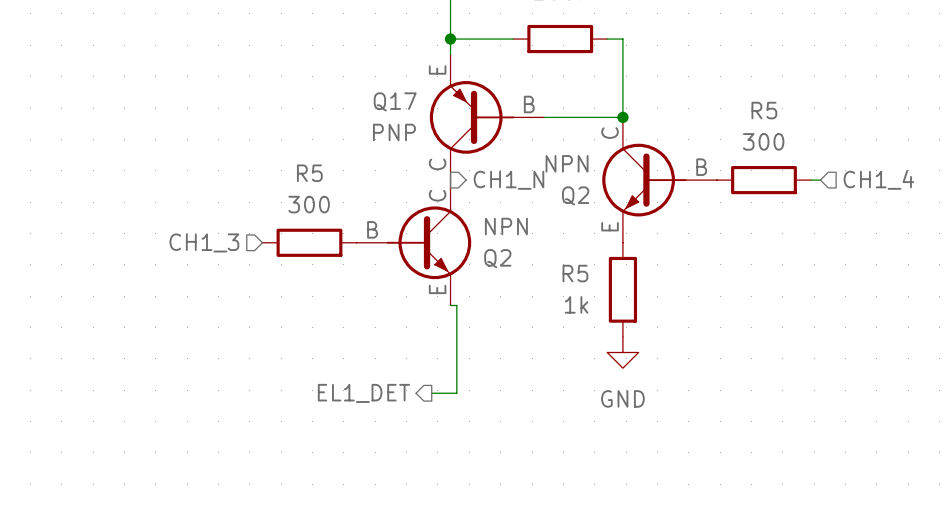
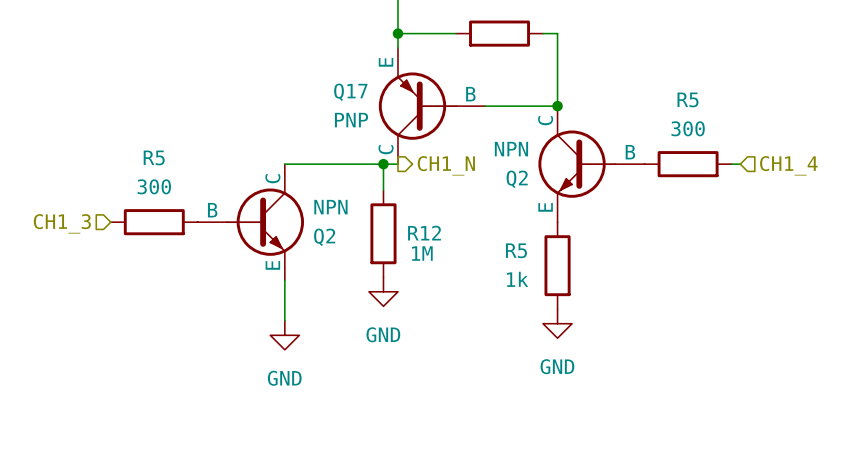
wire: none -> (284, 164) (397, 164)
wire: none -> (383, 164) (383, 190)
junction: none -> (383, 164)
hierarchical label position: CH1_3 (204, 242) -> CH1_3 (62, 223)
R5 position: (309, 242) -> (154, 222)
Q2 position: (413, 242) -> (250, 222)
R12: none -> 1M (383, 233)
wire: none -> (284, 280) (284, 320)
wire: (450, 305) (456, 305) (456, 393) (431, 393) -> none
power symbol: none -> GND (383, 291)
power symbol: none -> GND (284, 335)
hierarchical label: EL1_DET (363, 393) -> none

